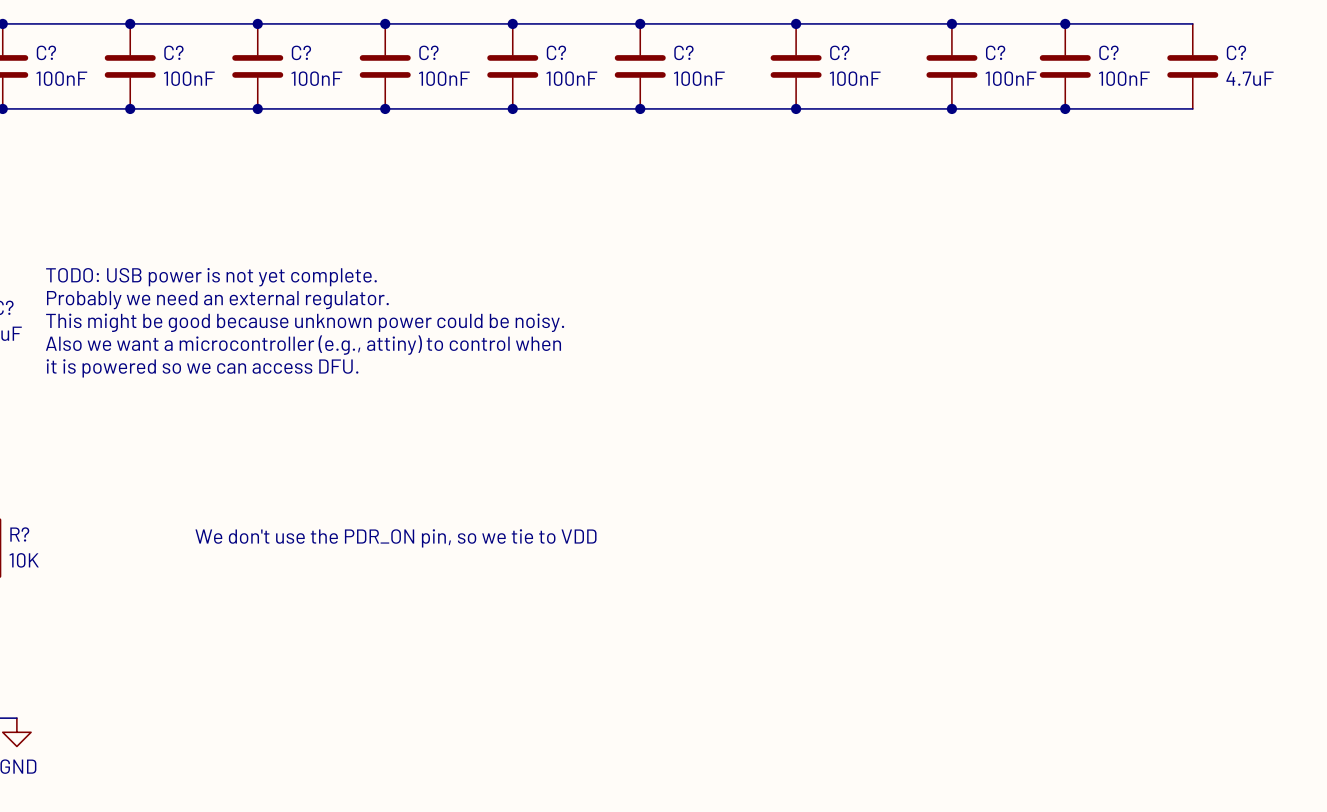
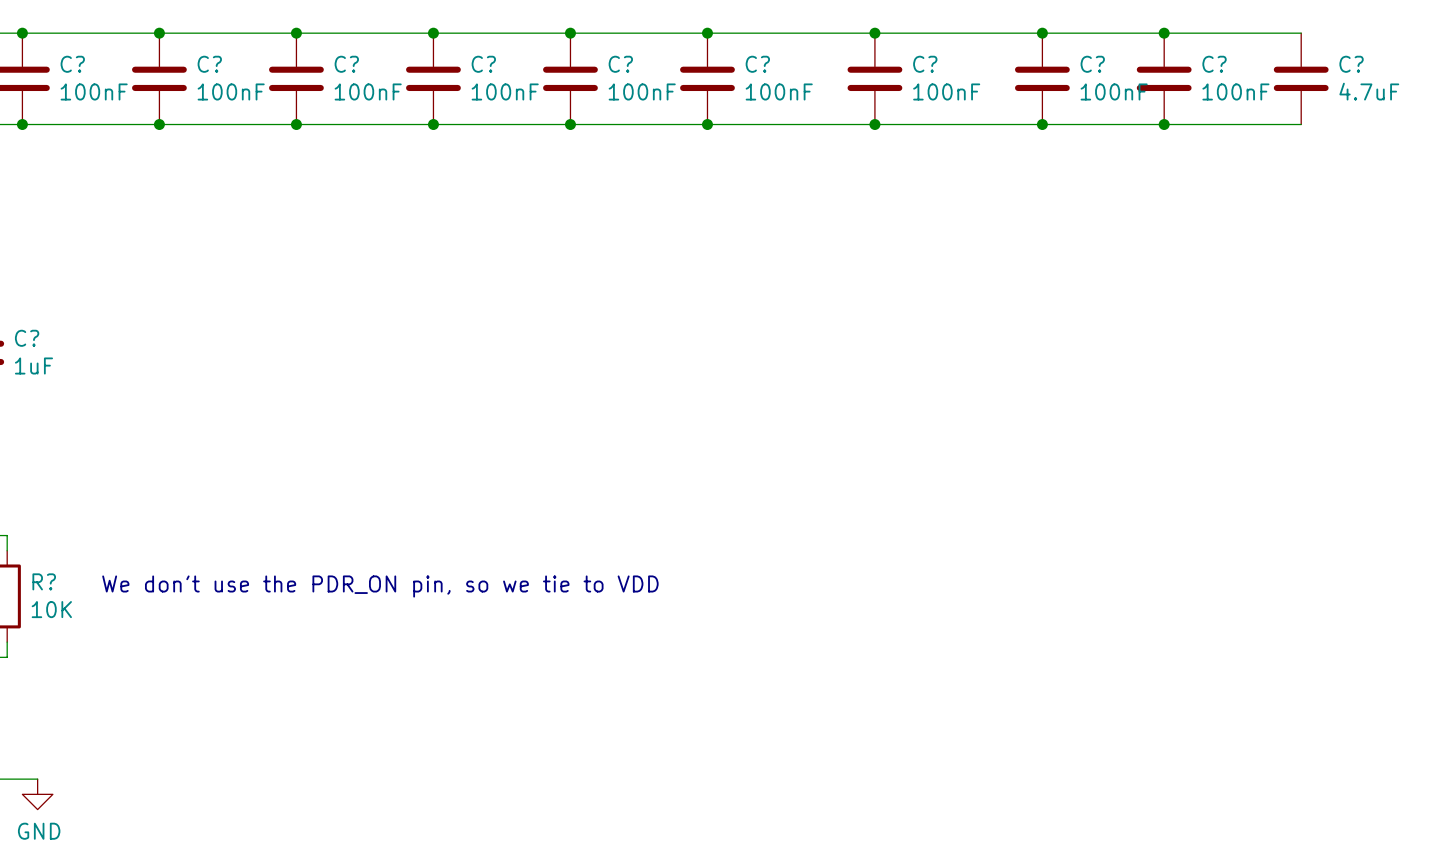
text: TODO: USB power is not yet complete. (211, 277) -> none
text: Probably we need an external regulator. (217, 300) -> none
text: This might be good because unknown power could be noisy. (305, 322) -> none
text: Also we want a microcontroller (e.g., attiny) to control when (303, 345) -> none
text: it is powered so we can access DFU. (202, 368) -> none

